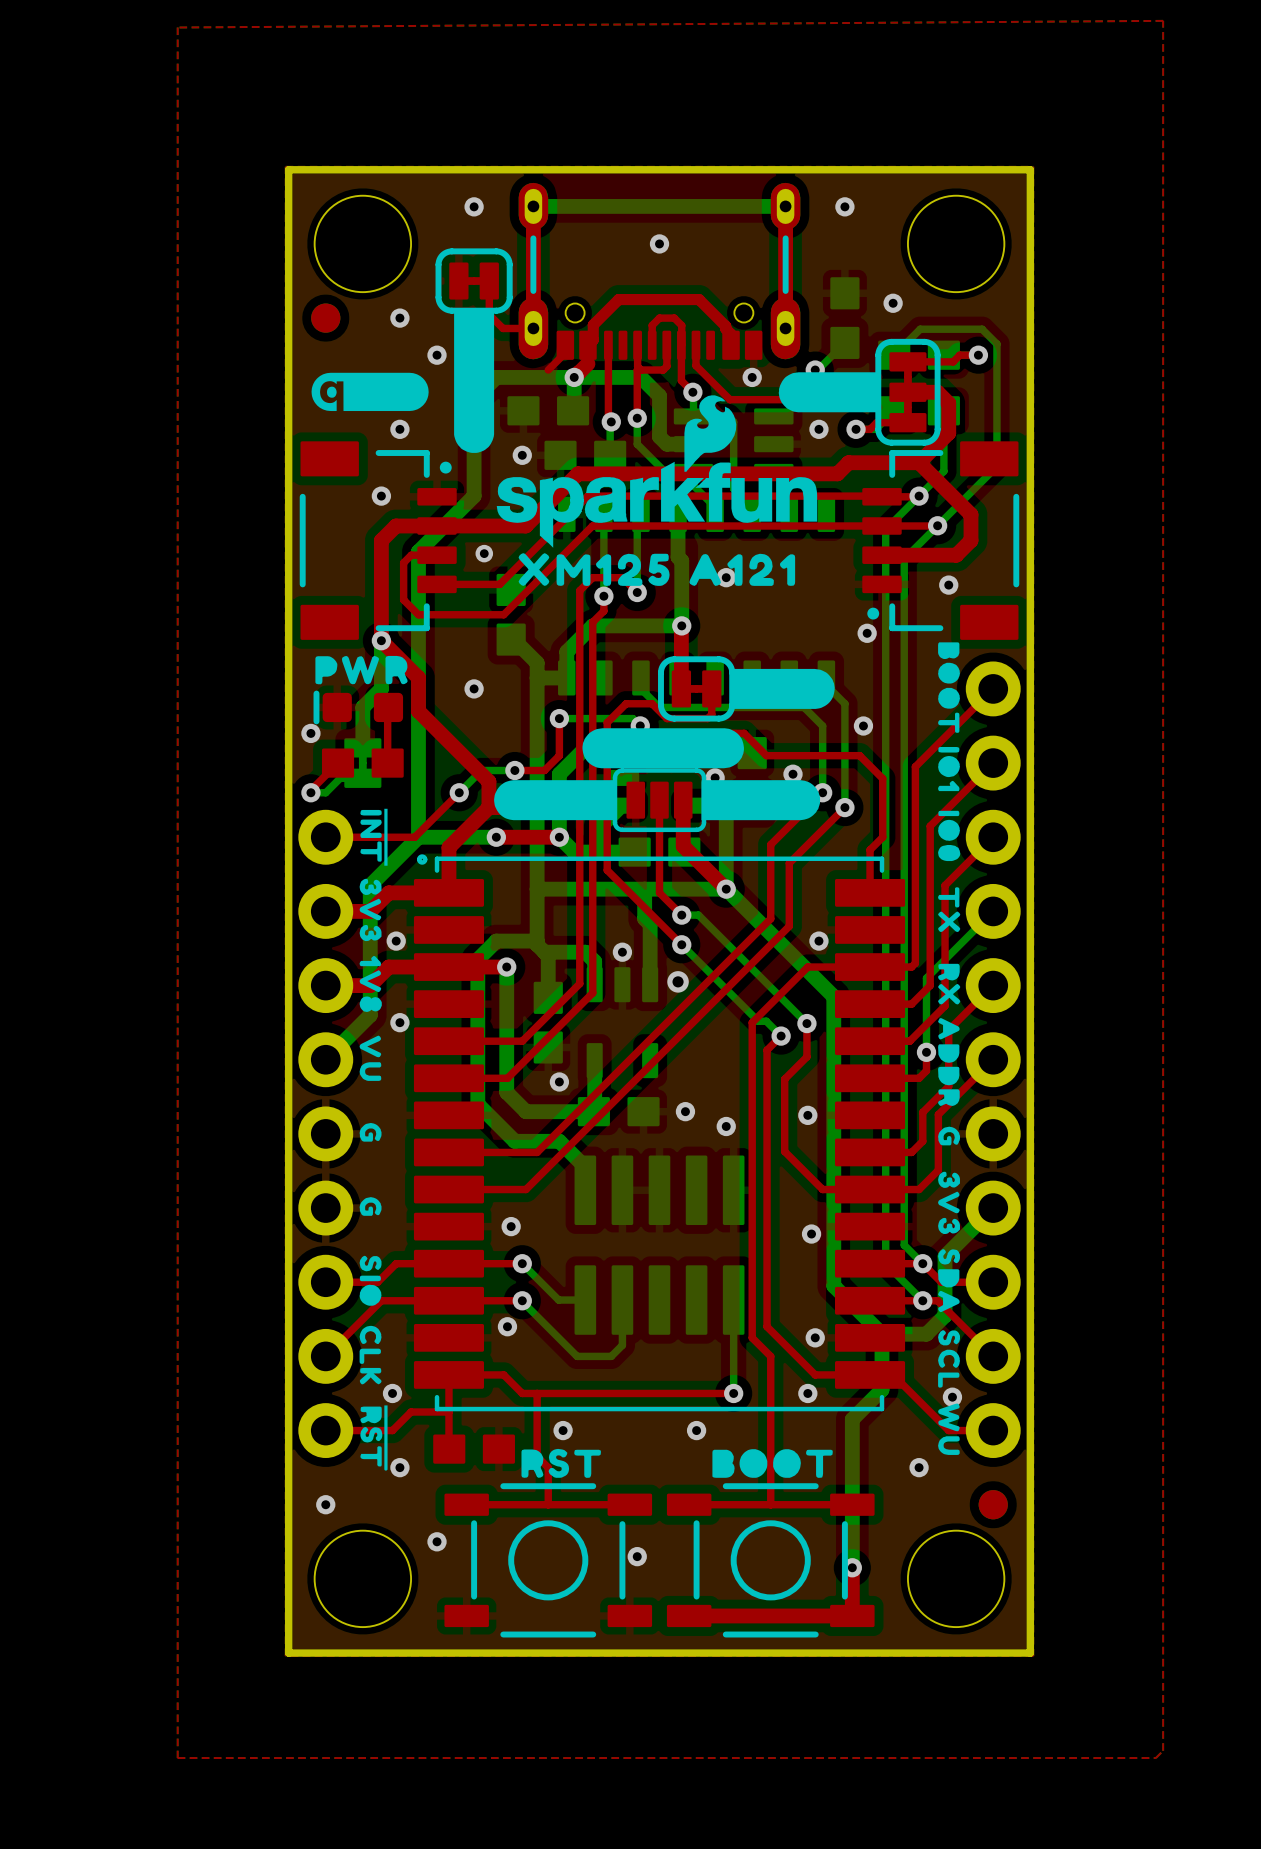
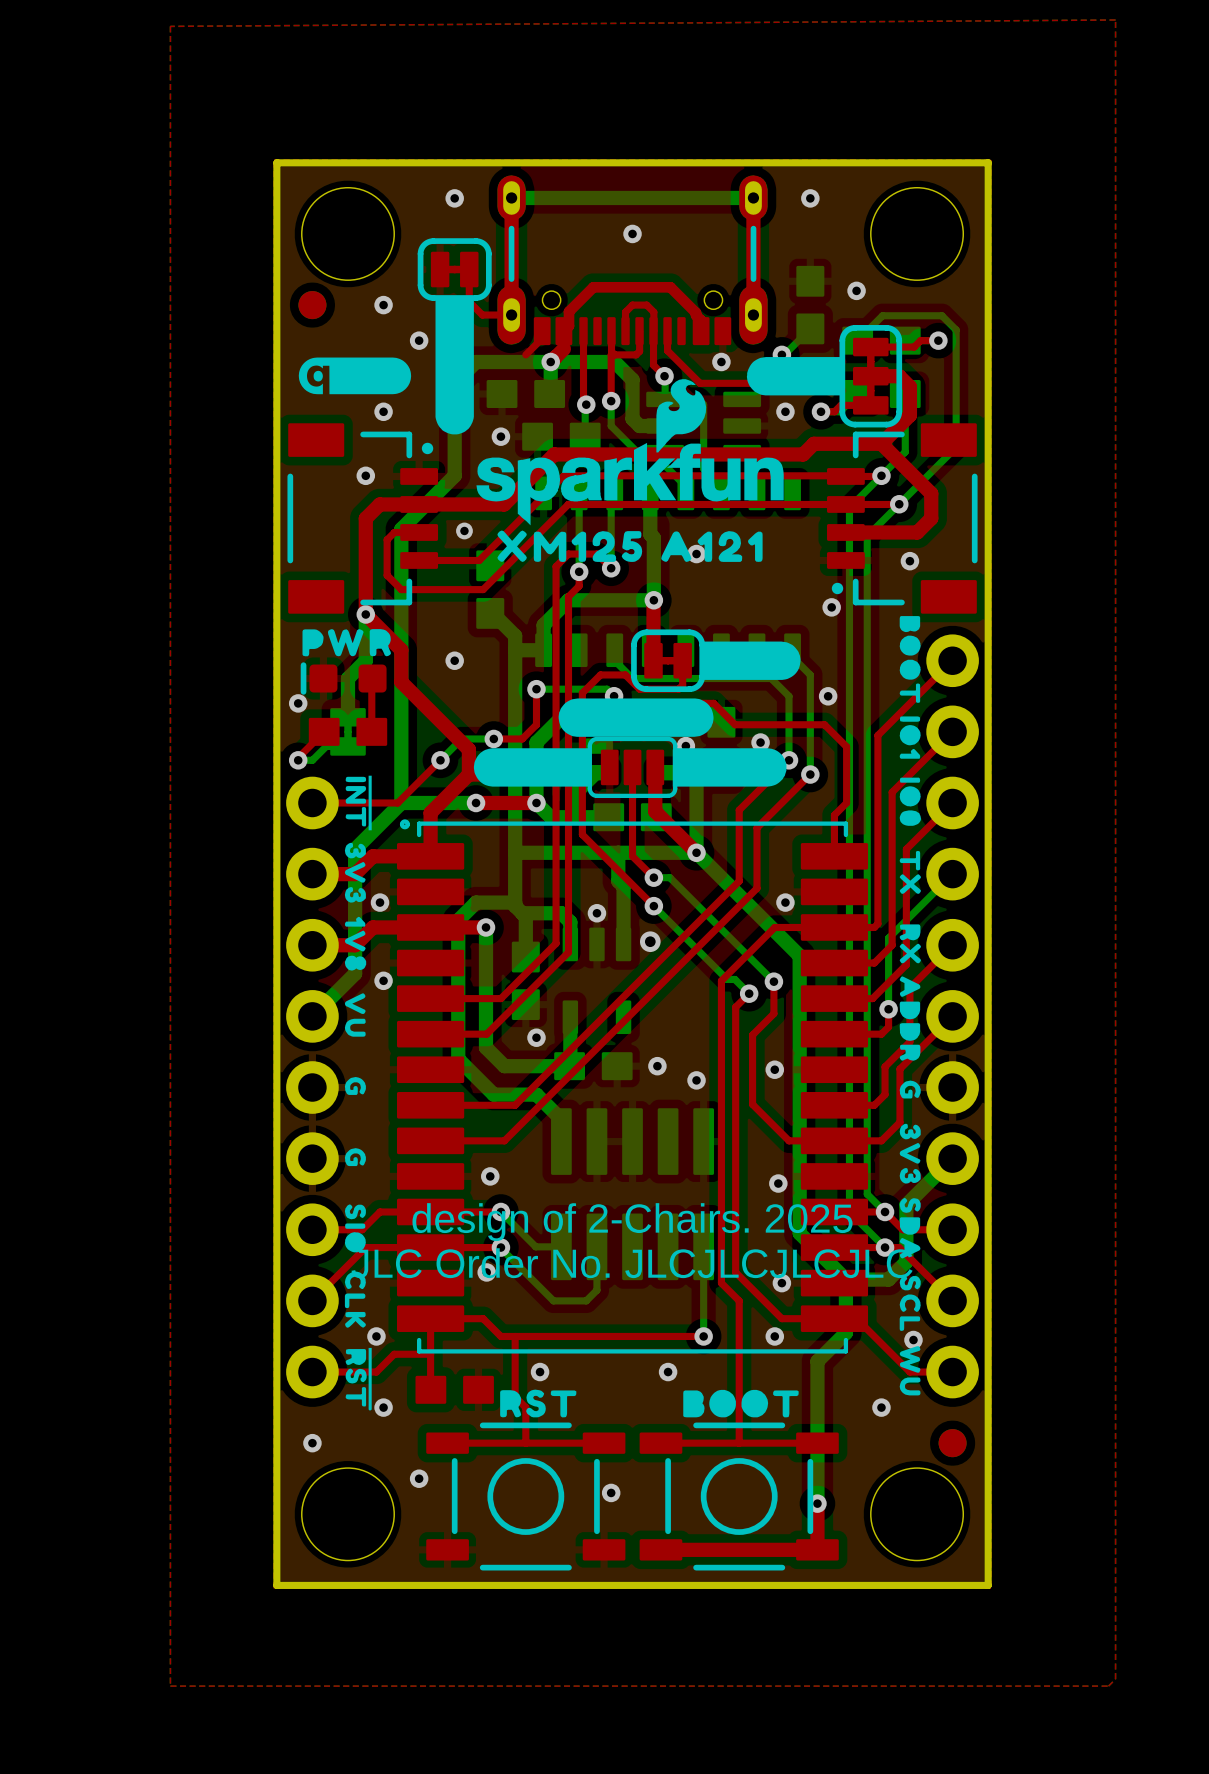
text: none -> design of 2-Chairs. 2025 (632, 1222)
text: none -> JLC Order No. JLCJLCJLCJLC (632, 1263)

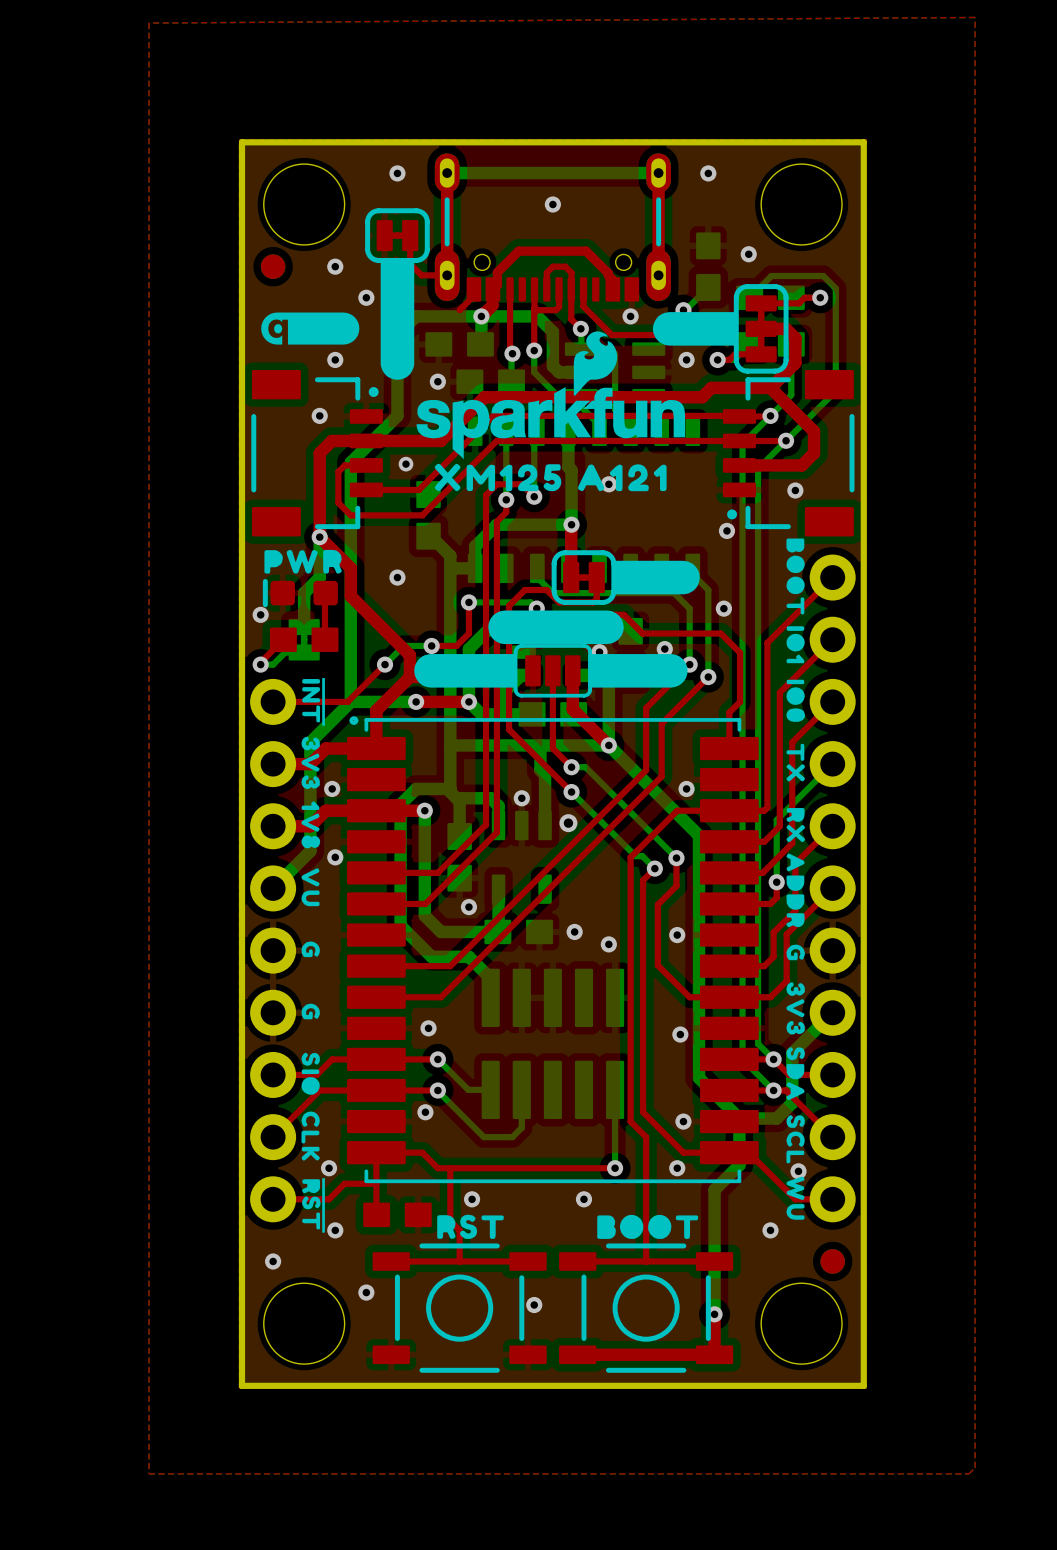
text: design of 2-Chairs. 2025 (632, 1222) -> none
text: JLC Order No. JLCJLCJLCJLC (632, 1263) -> none

